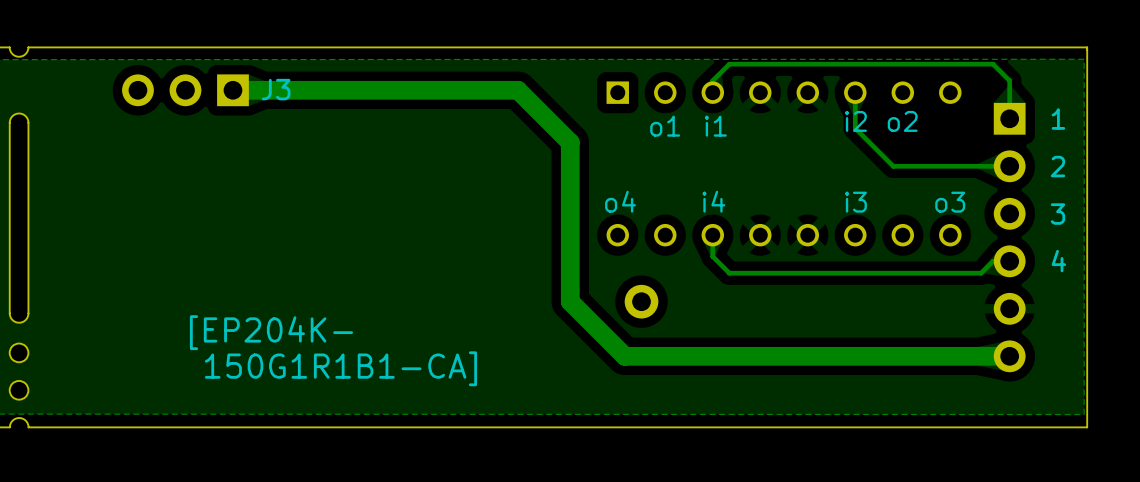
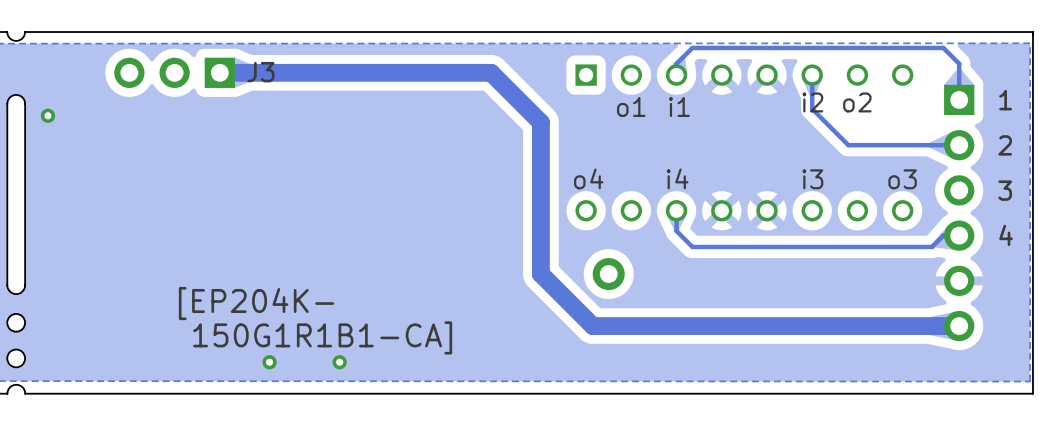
via: none -> (47, 115)
via: none -> (269, 362)
via: none -> (339, 362)

